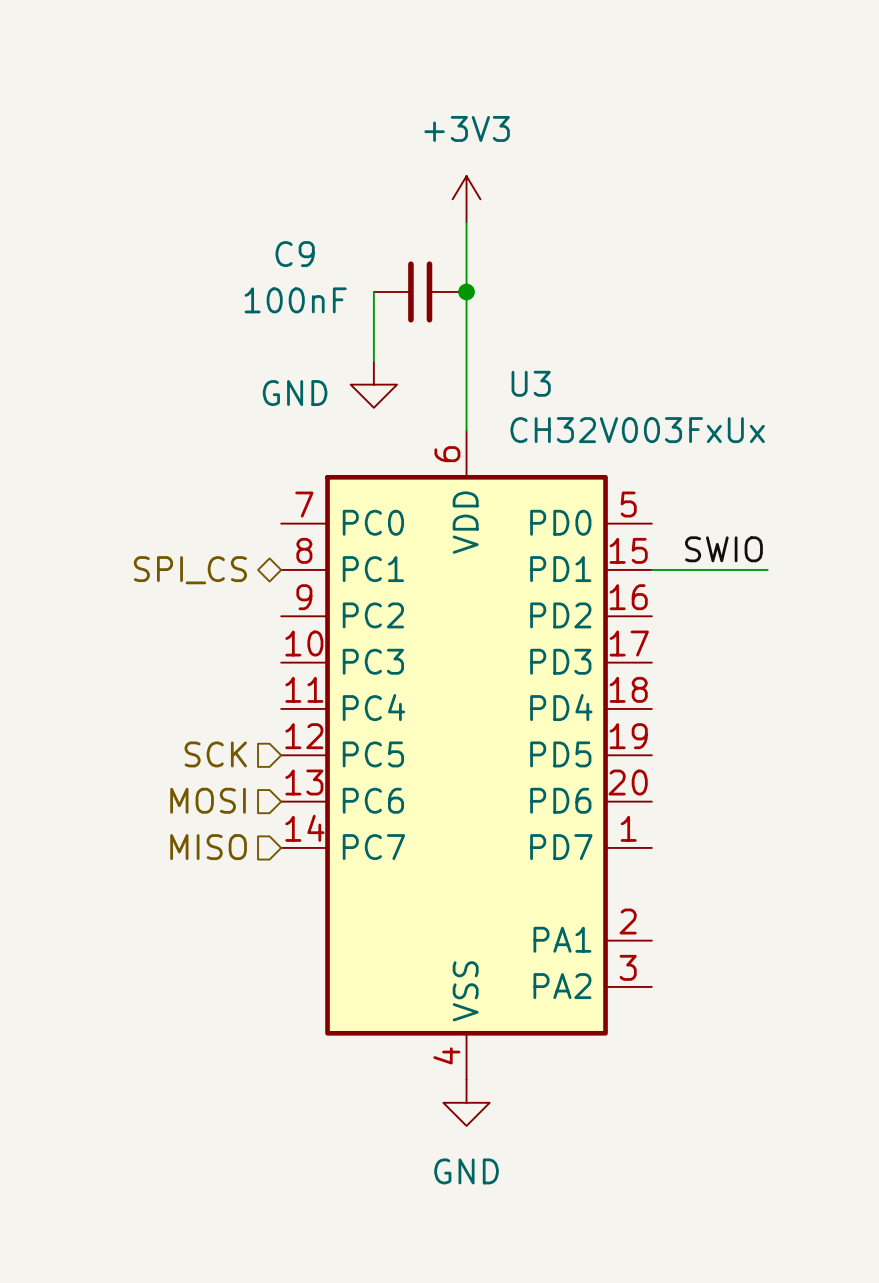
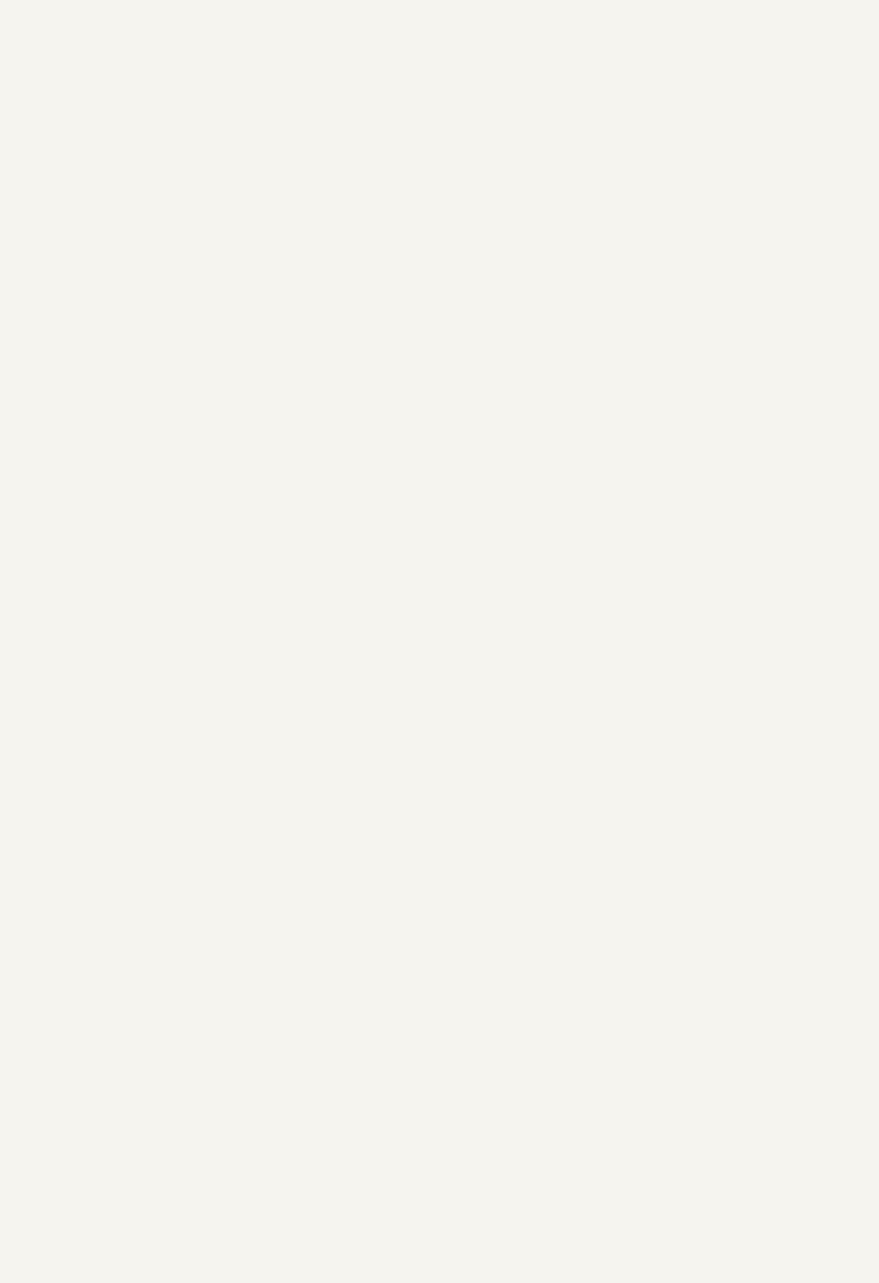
power symbol: +3V3 (466, 199) -> none
wire: (466, 222) (466, 430) -> none
wire: (373, 291) (373, 361) -> none
C9: 100nF (420, 291) -> none
junction: (466, 291) -> none
power symbol: GND (373, 384) -> none
label: SWIO (723, 549) -> none
wire: (651, 569) (767, 569) -> none
hierarchical label: SPI_CS (190, 570) -> none
hierarchical label: SCK (215, 754) -> none
U3: CH32V003FxUx (466, 755) -> none
hierarchical label: MOSI (208, 800) -> none
hierarchical label: MISO (208, 847) -> none
power symbol: GND (466, 1102) -> none

